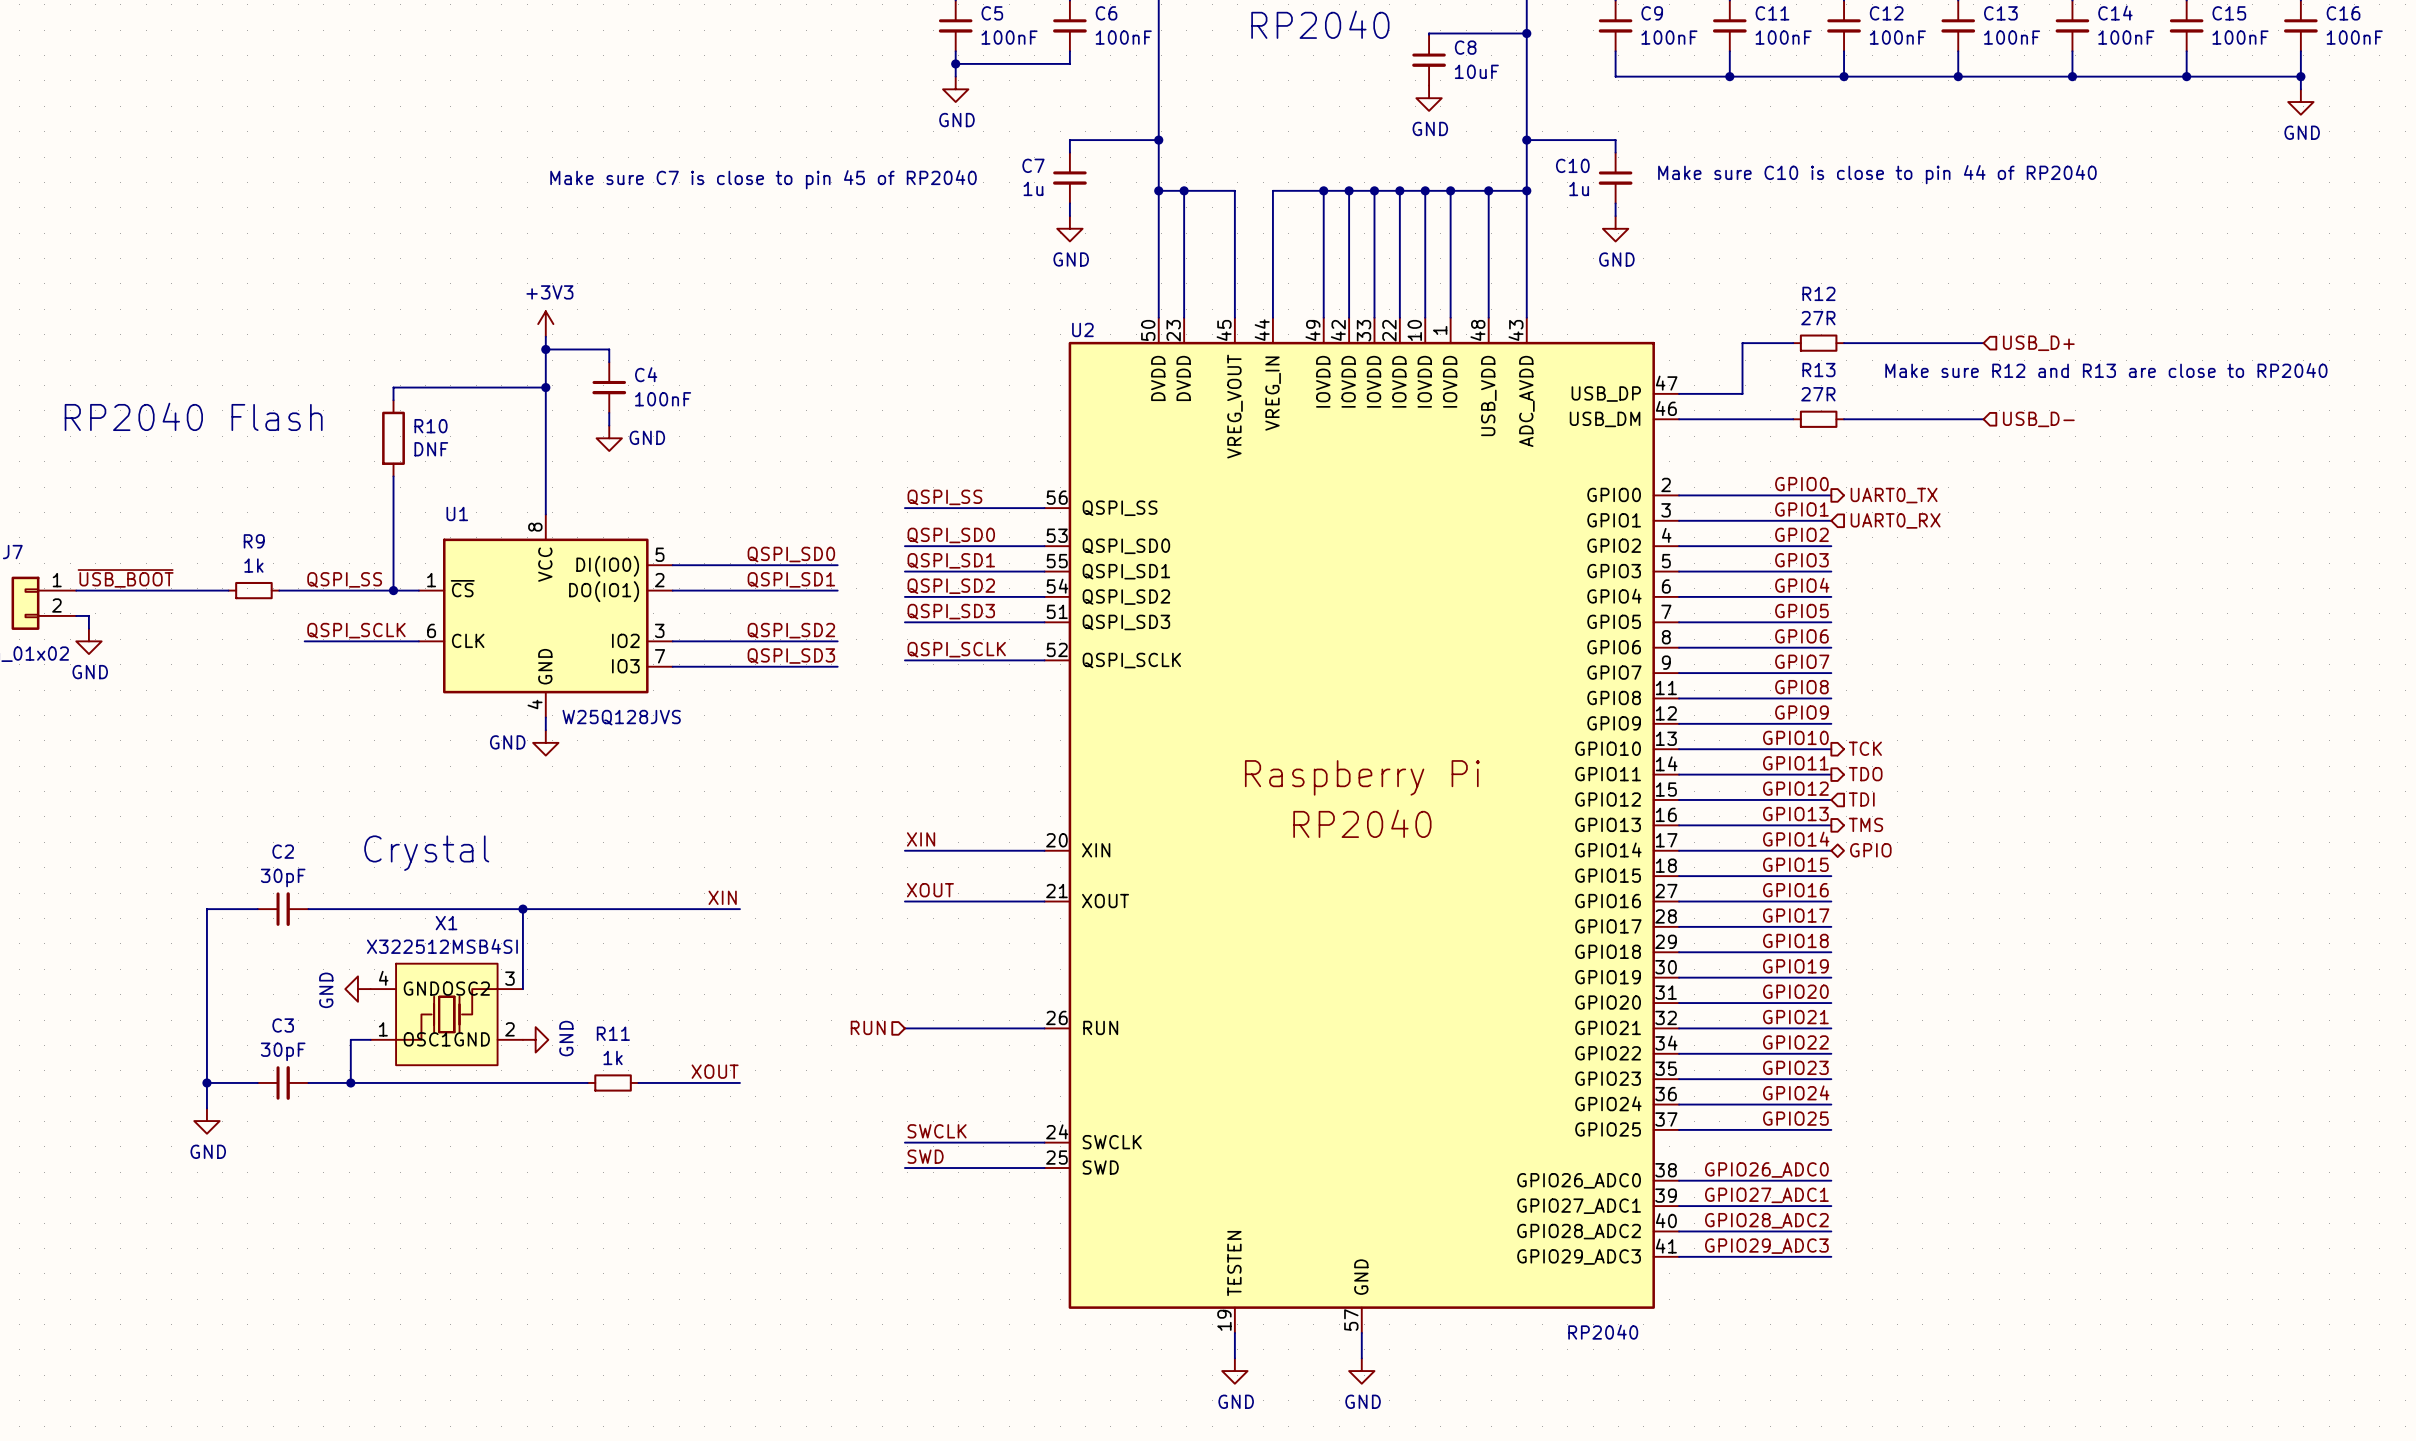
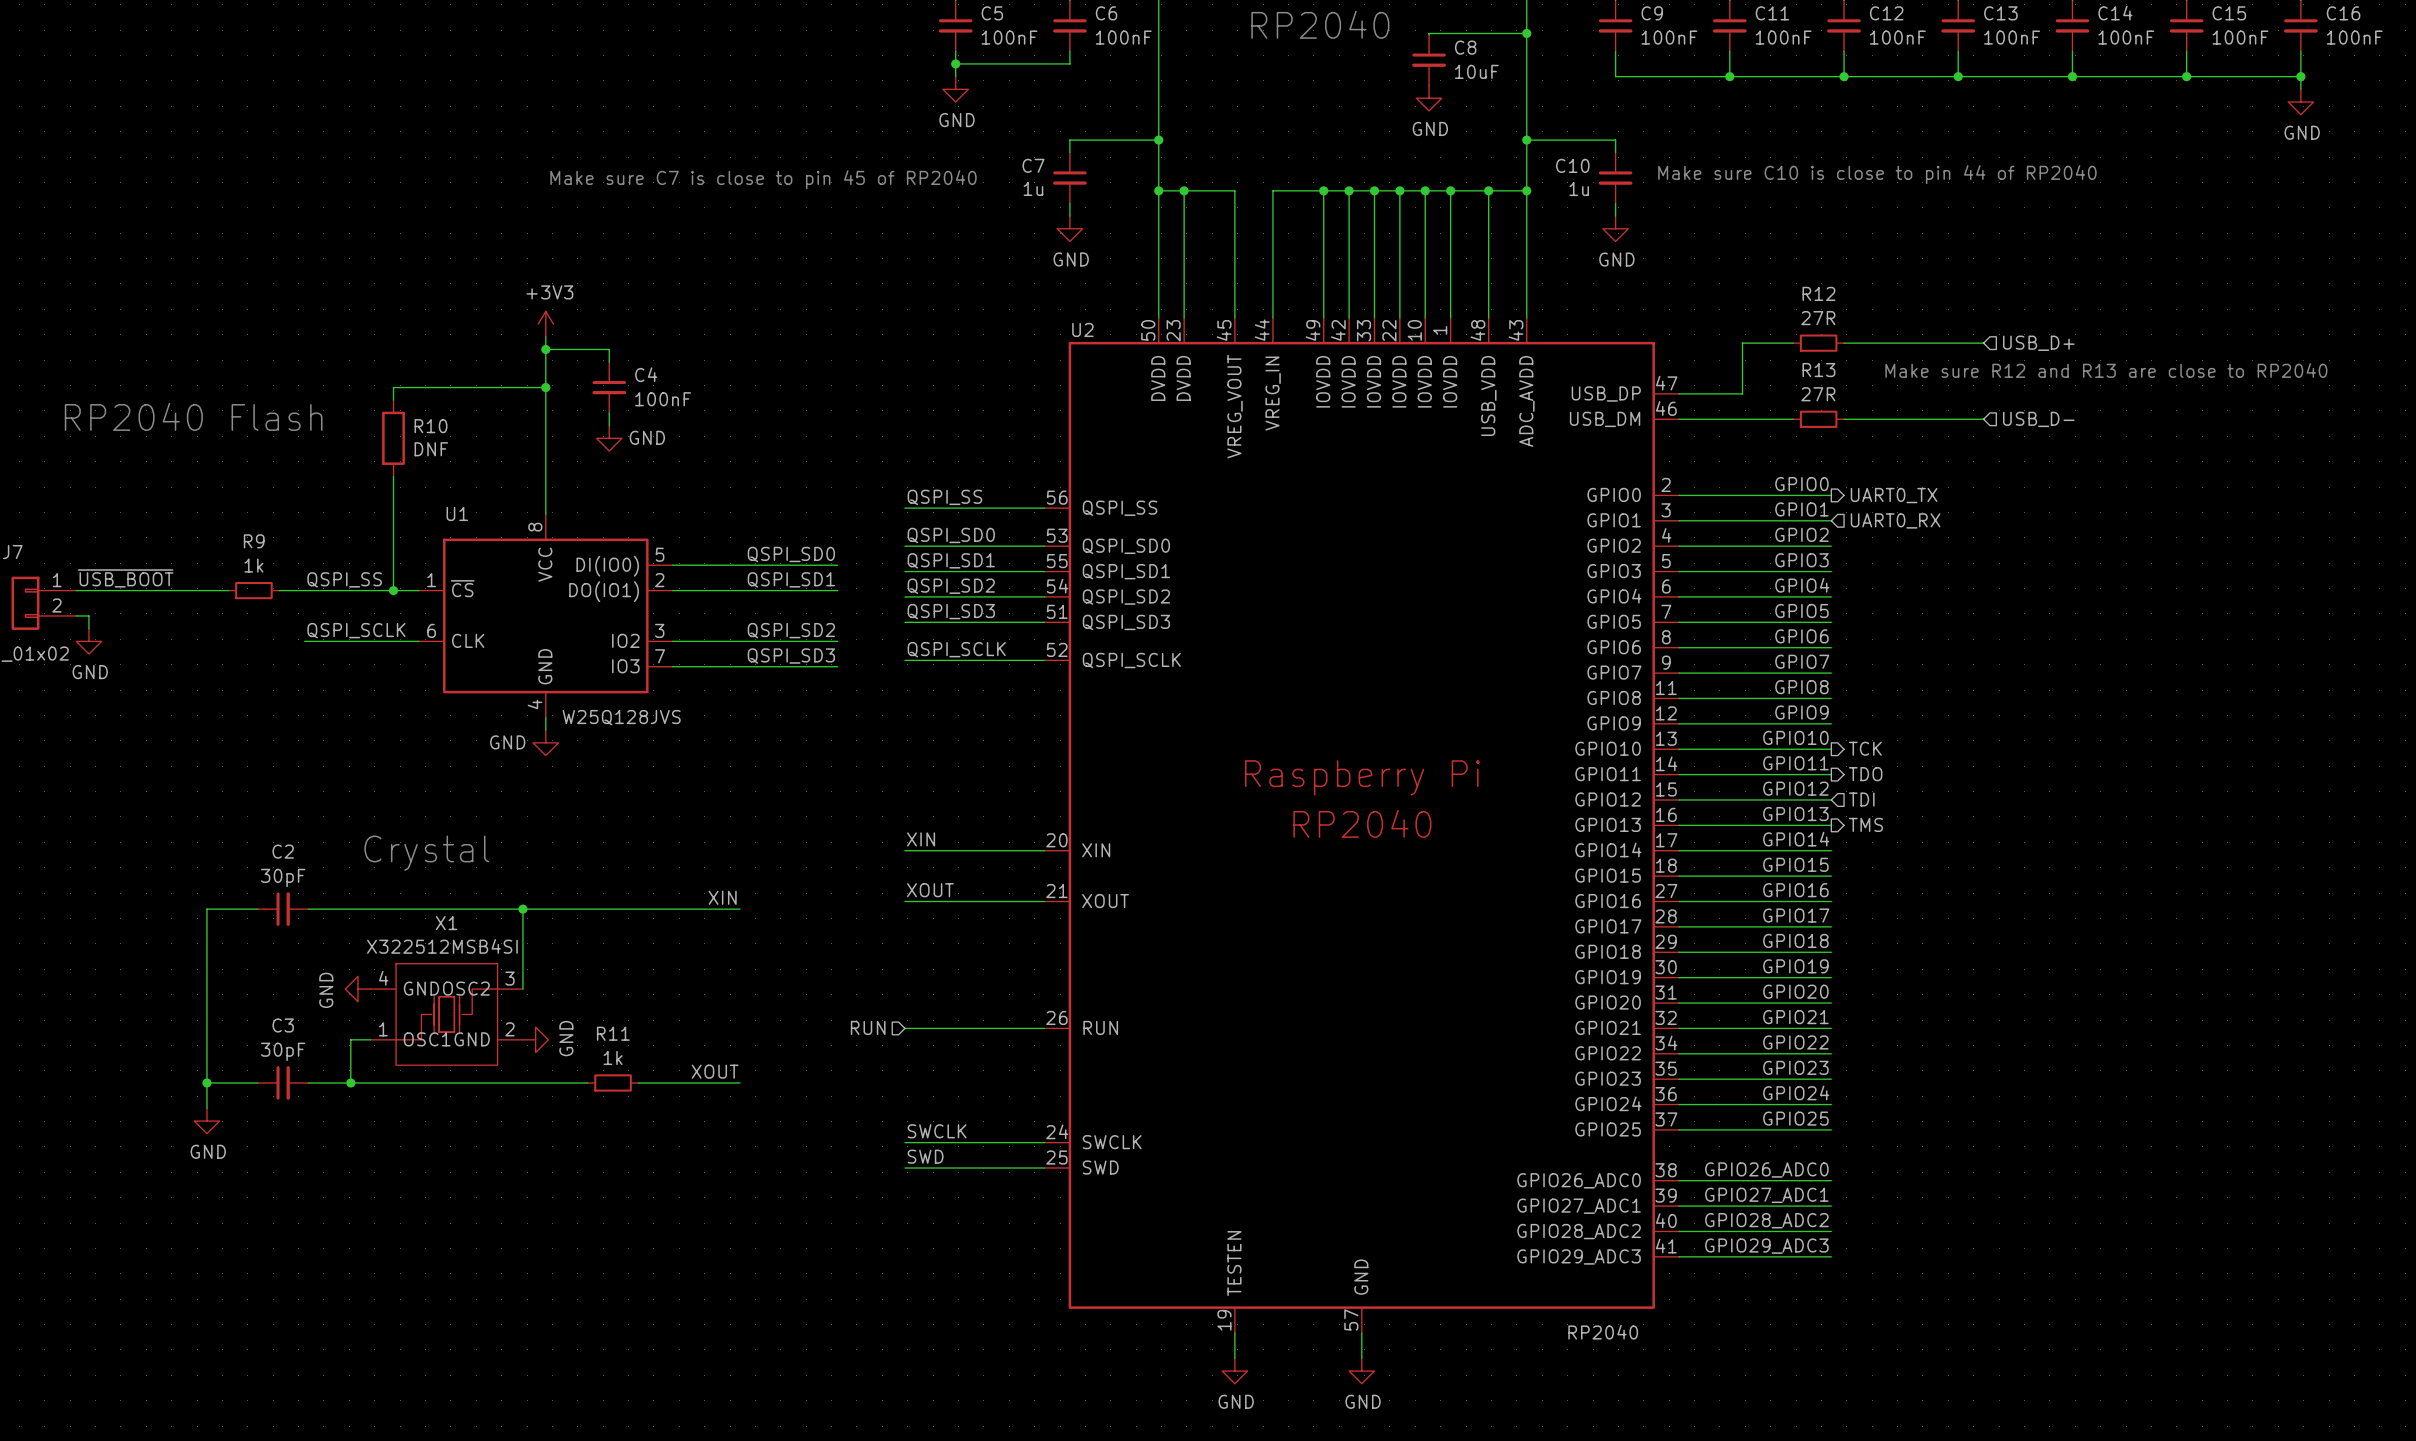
hierarchical label: GPIO (1870, 850) -> none

